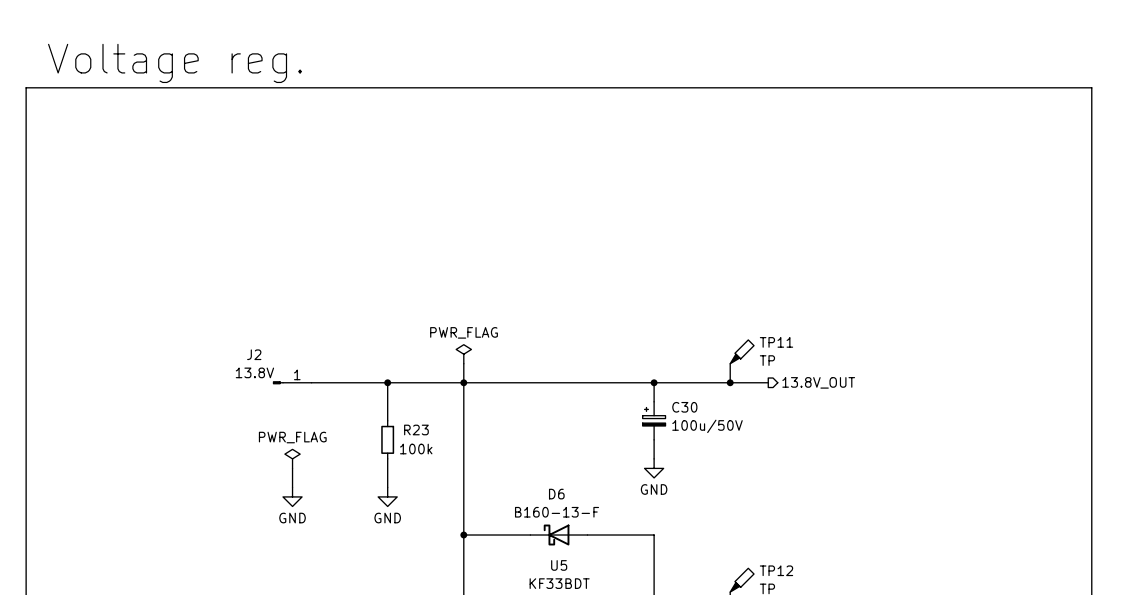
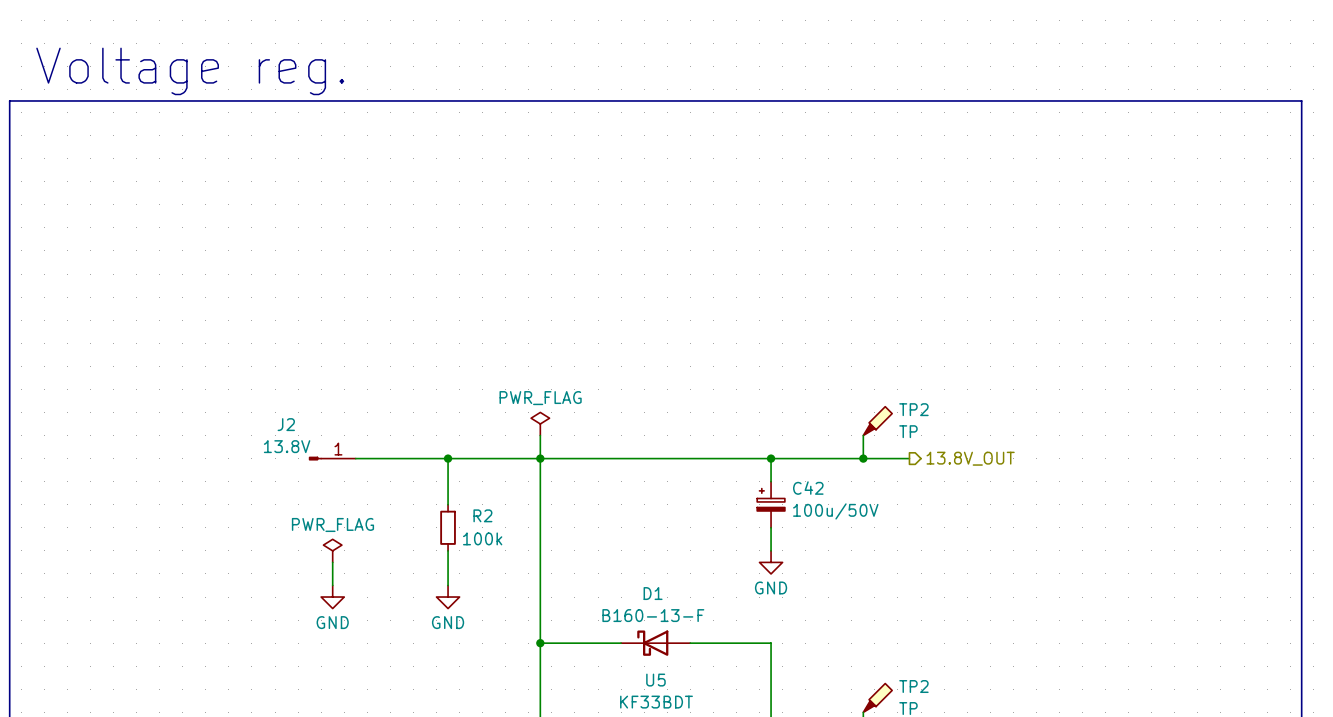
TP11 name: TP11 (776, 342) -> TP2 (913, 409)
C30 name: C30 (684, 407) -> C42 (808, 488)
R23 name: R23 (416, 429) -> R2 (482, 515)
D6 name: D6 (556, 494) -> D1 (653, 593)
TP12 name: TP12 (776, 570) -> TP2 (913, 686)

